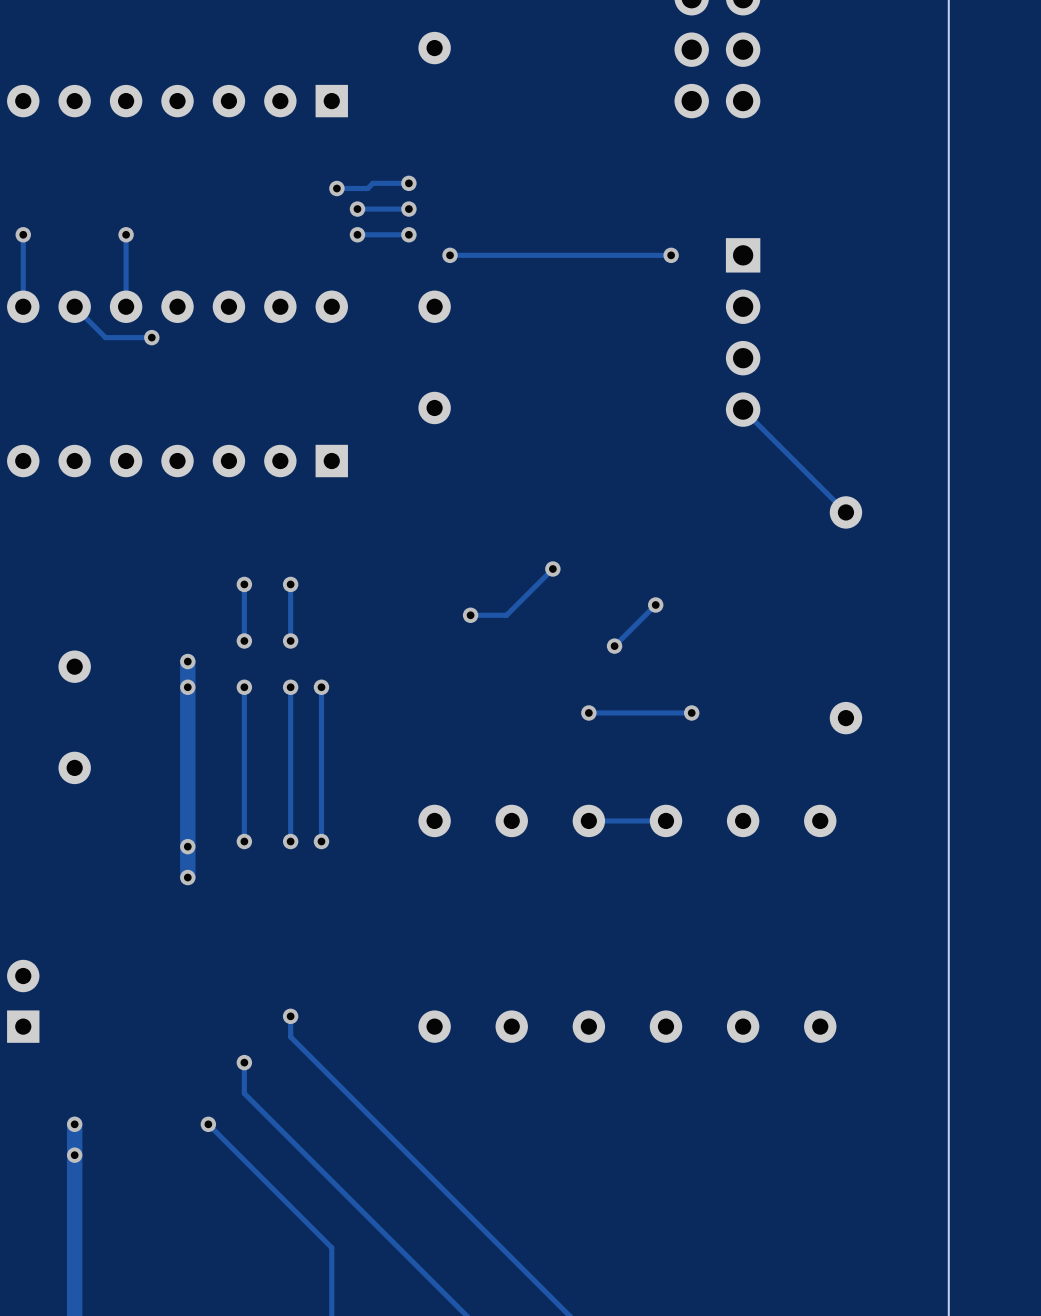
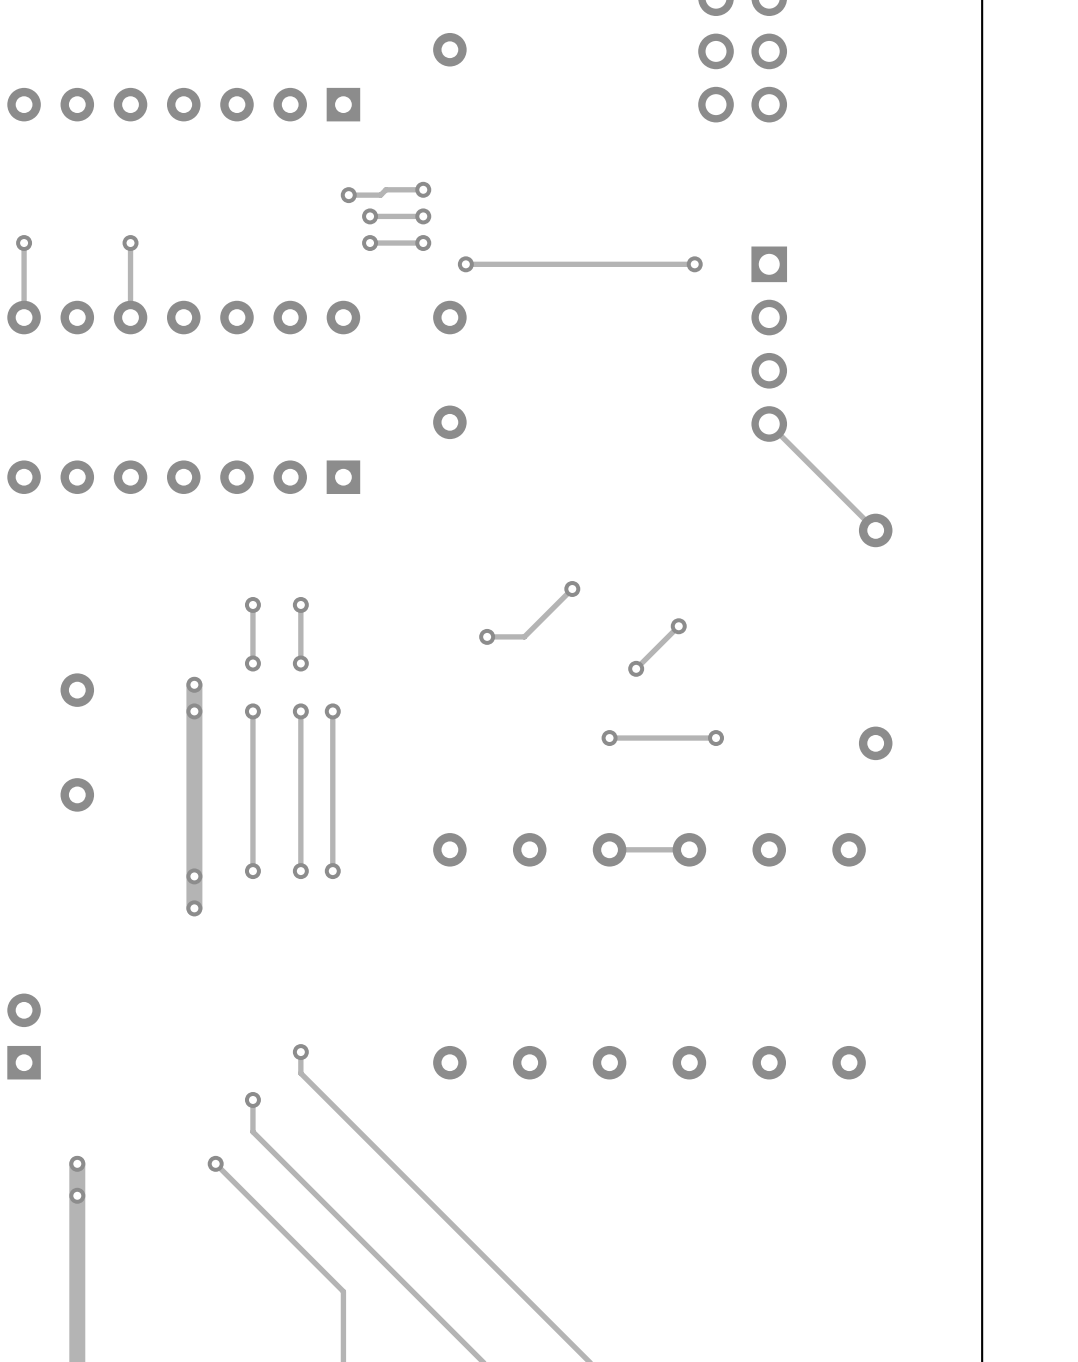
track: (74, 306) (105, 337) (151, 337) -> none
via: (151, 337) -> none

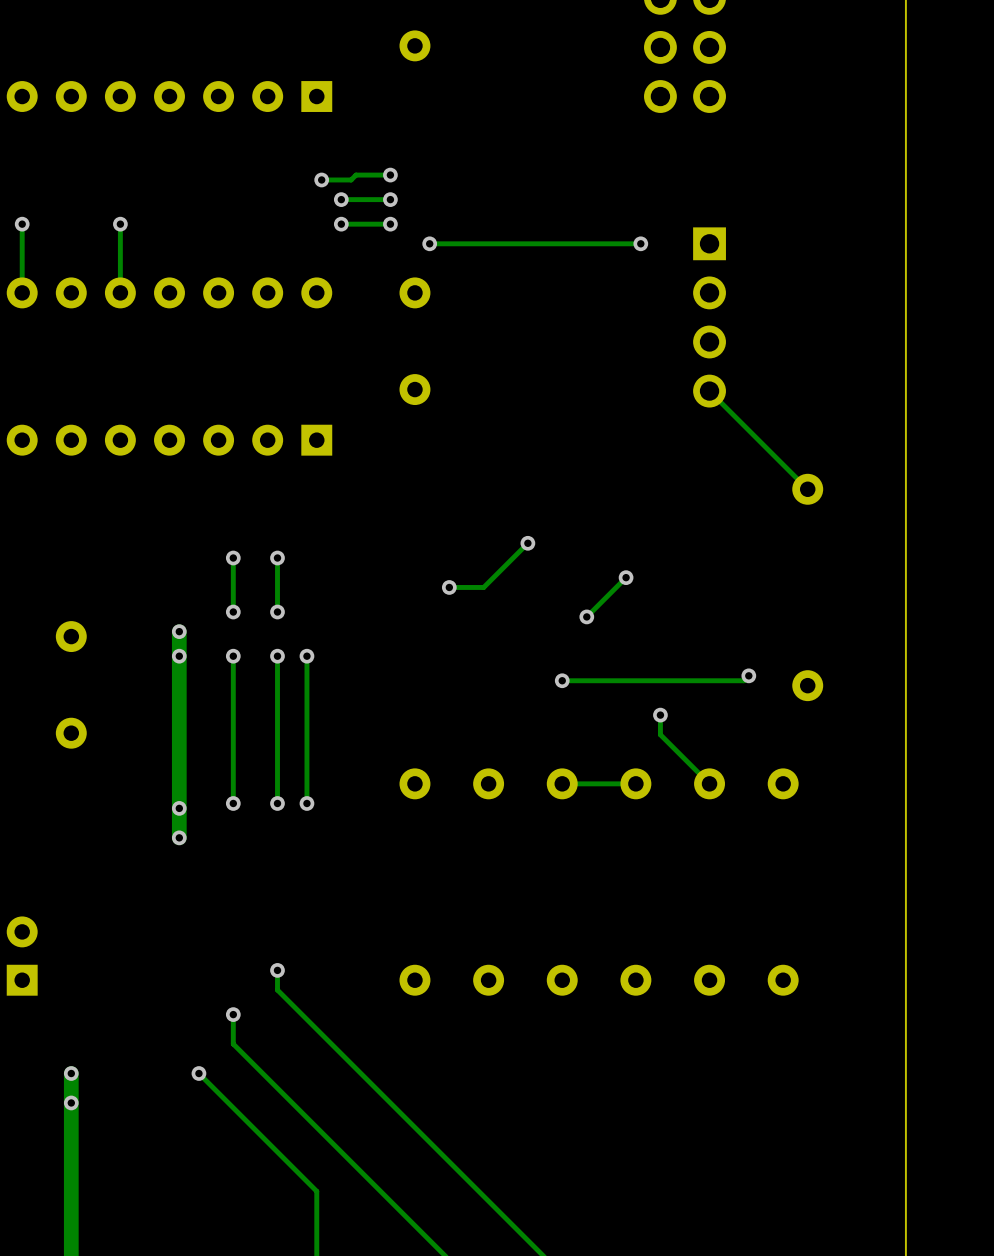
track: none -> (748, 675) (743, 680) (660, 680)
via: none -> (748, 675)
via position: (716, 738) -> (660, 715)
track: none -> (660, 715) (660, 734) (709, 783)

